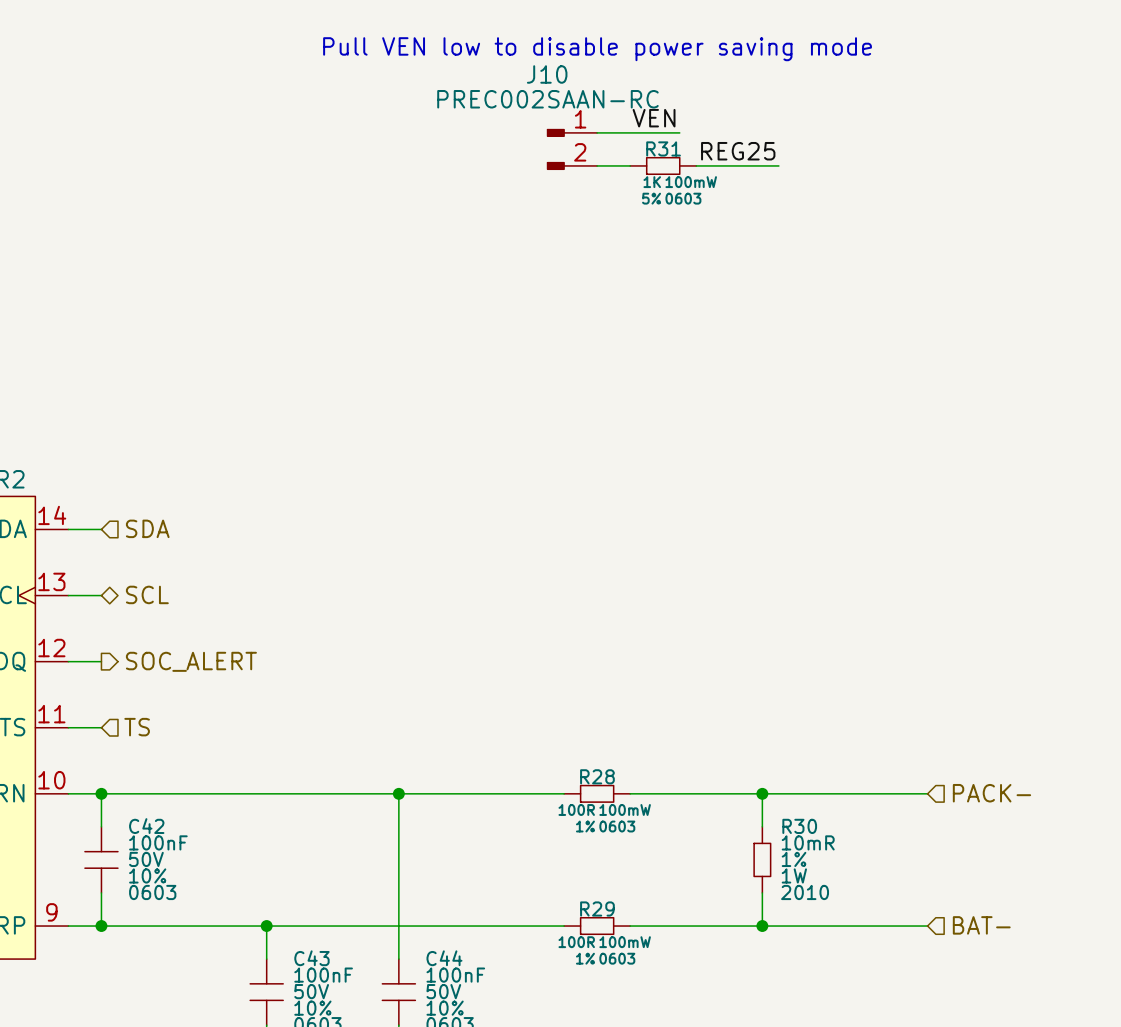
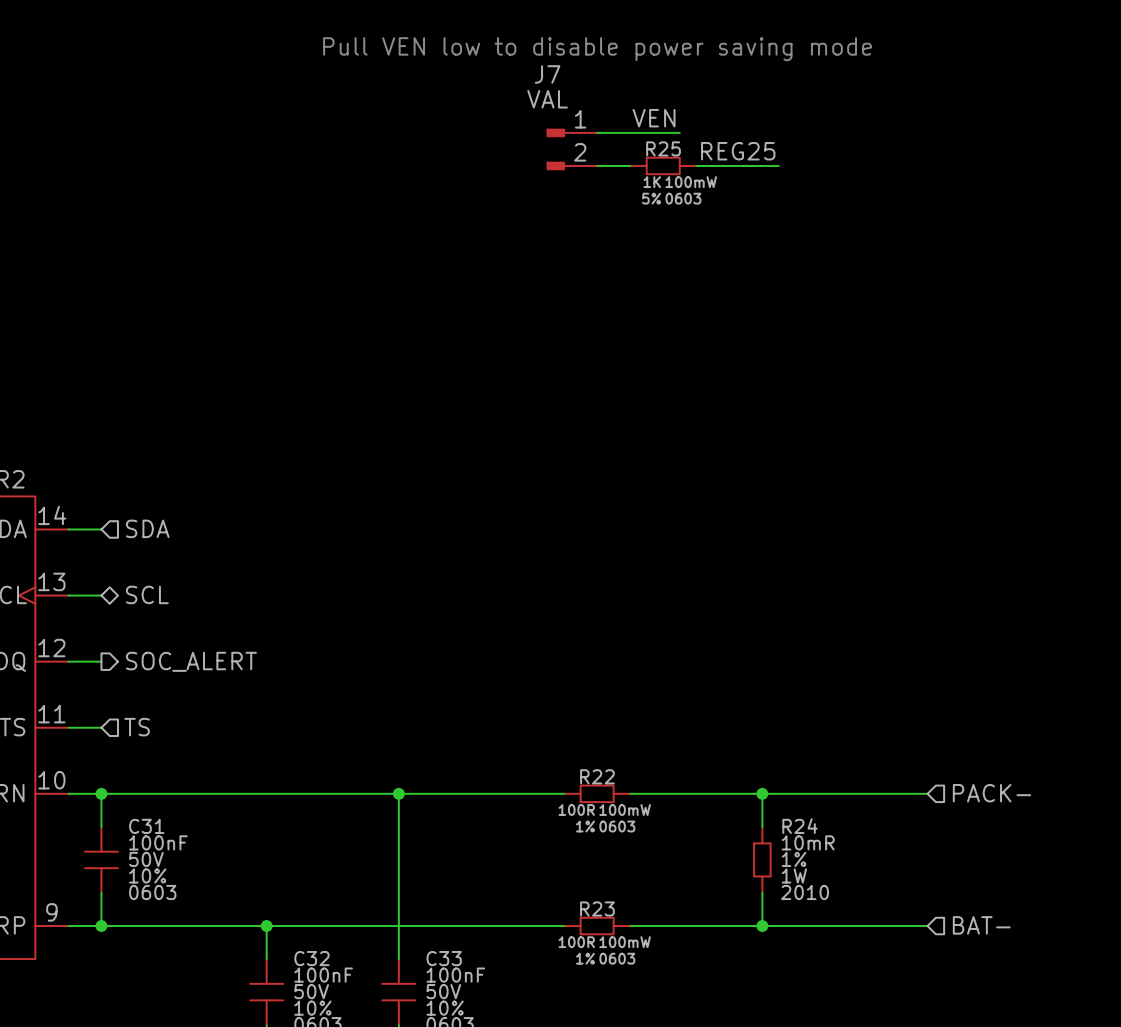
J10 name: J10 (547, 74) -> J7 (547, 74)
J10 value: PREC002SAAN-RC (547, 99) -> VAL (547, 99)
R31 name: R31 (663, 148) -> R25 (663, 148)
R28 name: R28 (597, 776) -> R22 (597, 776)
C42 name: C42 (146, 826) -> C31 (146, 826)
R30 name: R30 (799, 826) -> R24 (800, 826)
R29 name: R29 (597, 909) -> R23 (597, 909)
C43 name: C43 (311, 958) -> C32 (311, 958)
C44 name: C44 (444, 958) -> C33 (444, 958)

